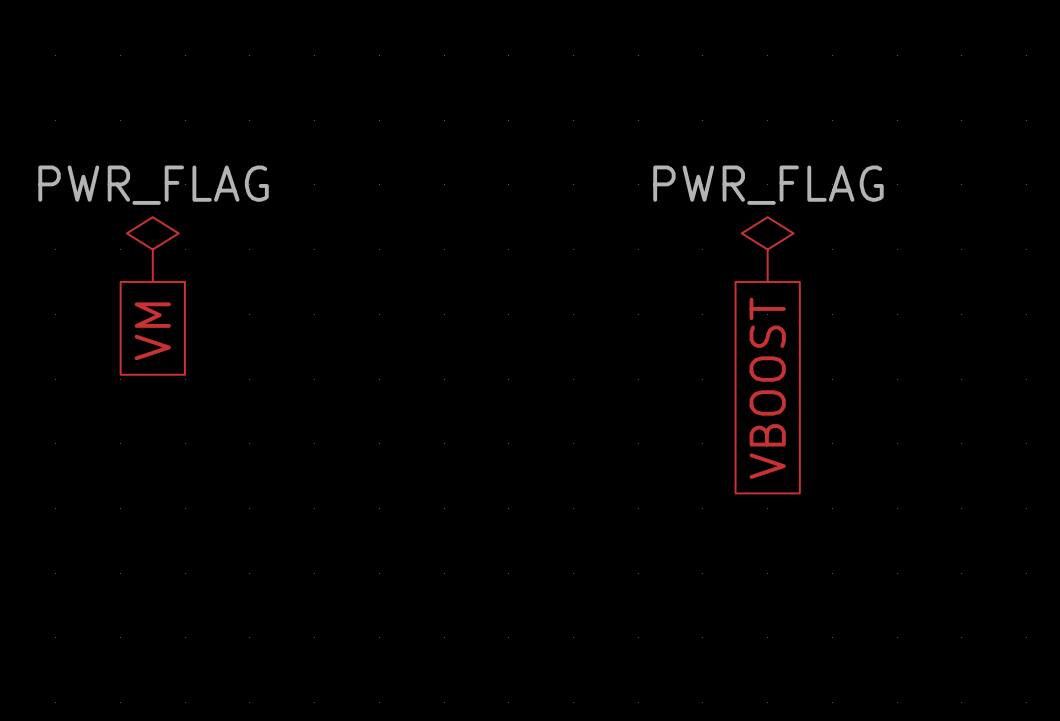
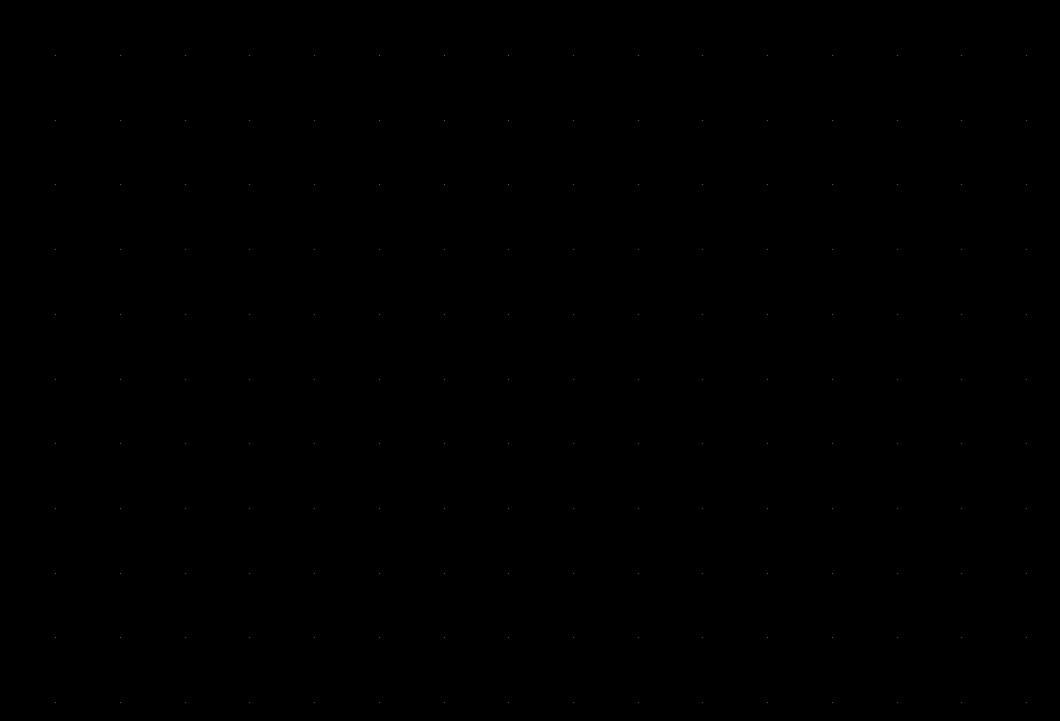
power symbol: PWR_FLAG (152, 249) -> none
power symbol: PWR_FLAG (767, 249) -> none
global label: VM (152, 331) -> none
global label: VBOOST (767, 388) -> none

